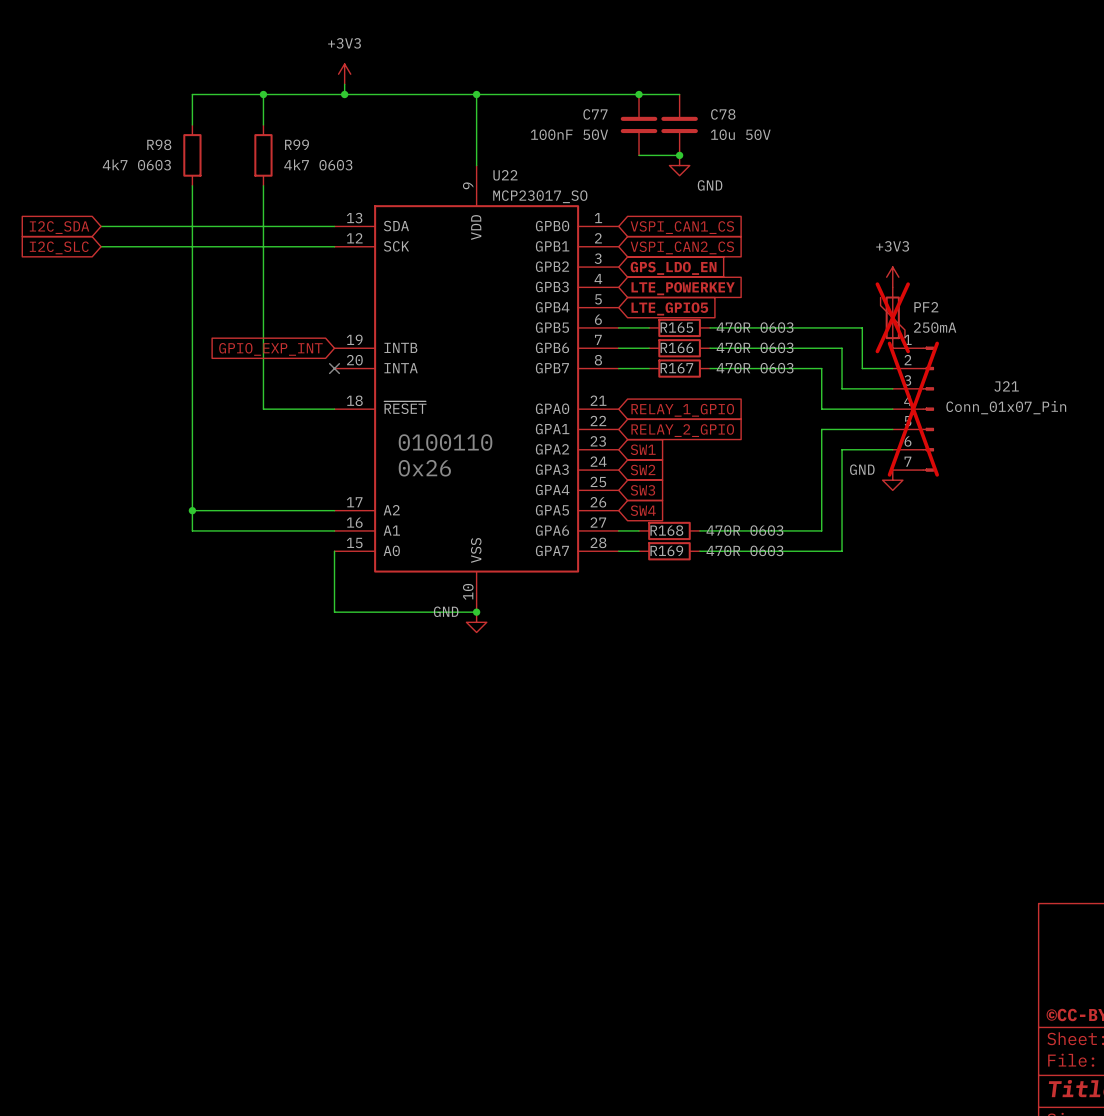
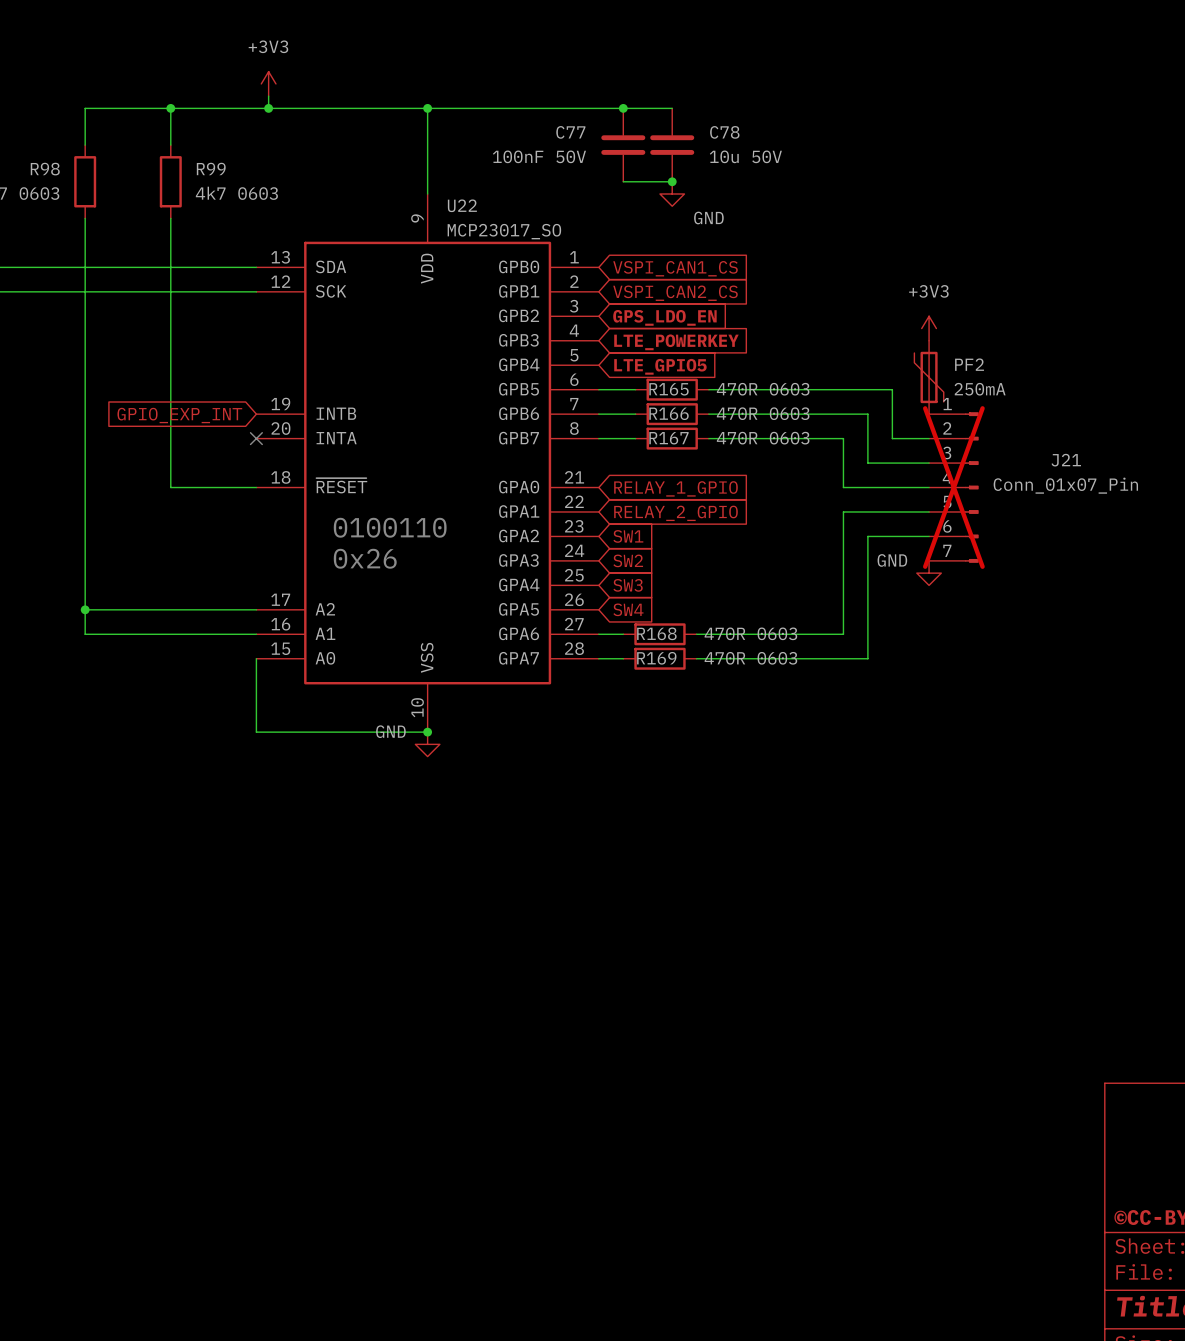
PF2 do-not-place cross: (892, 317) -> none

